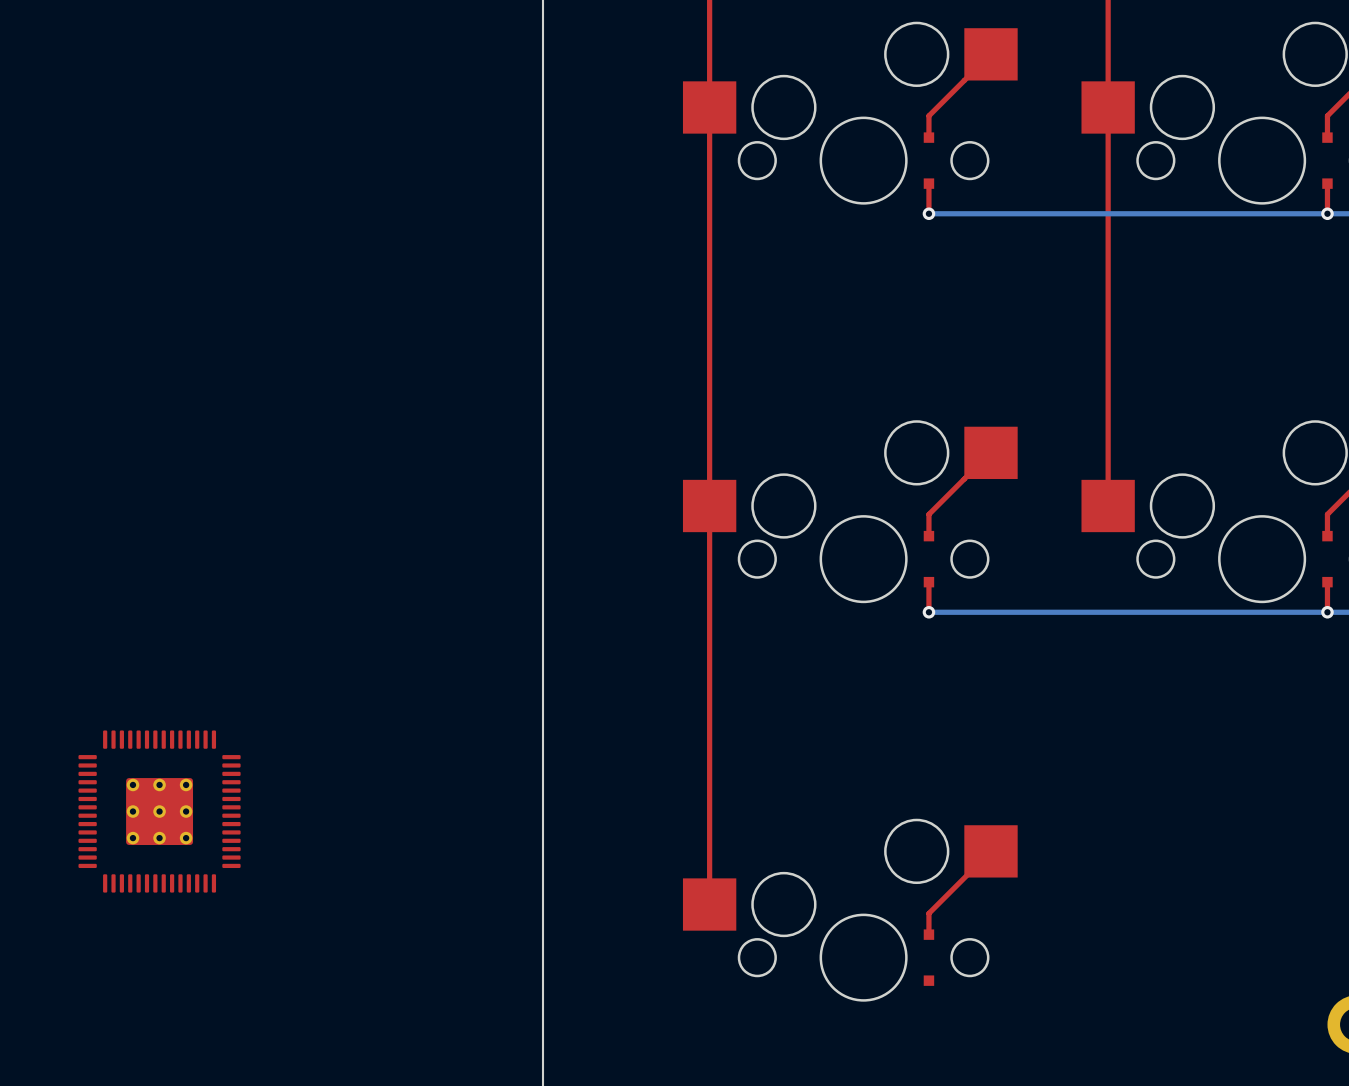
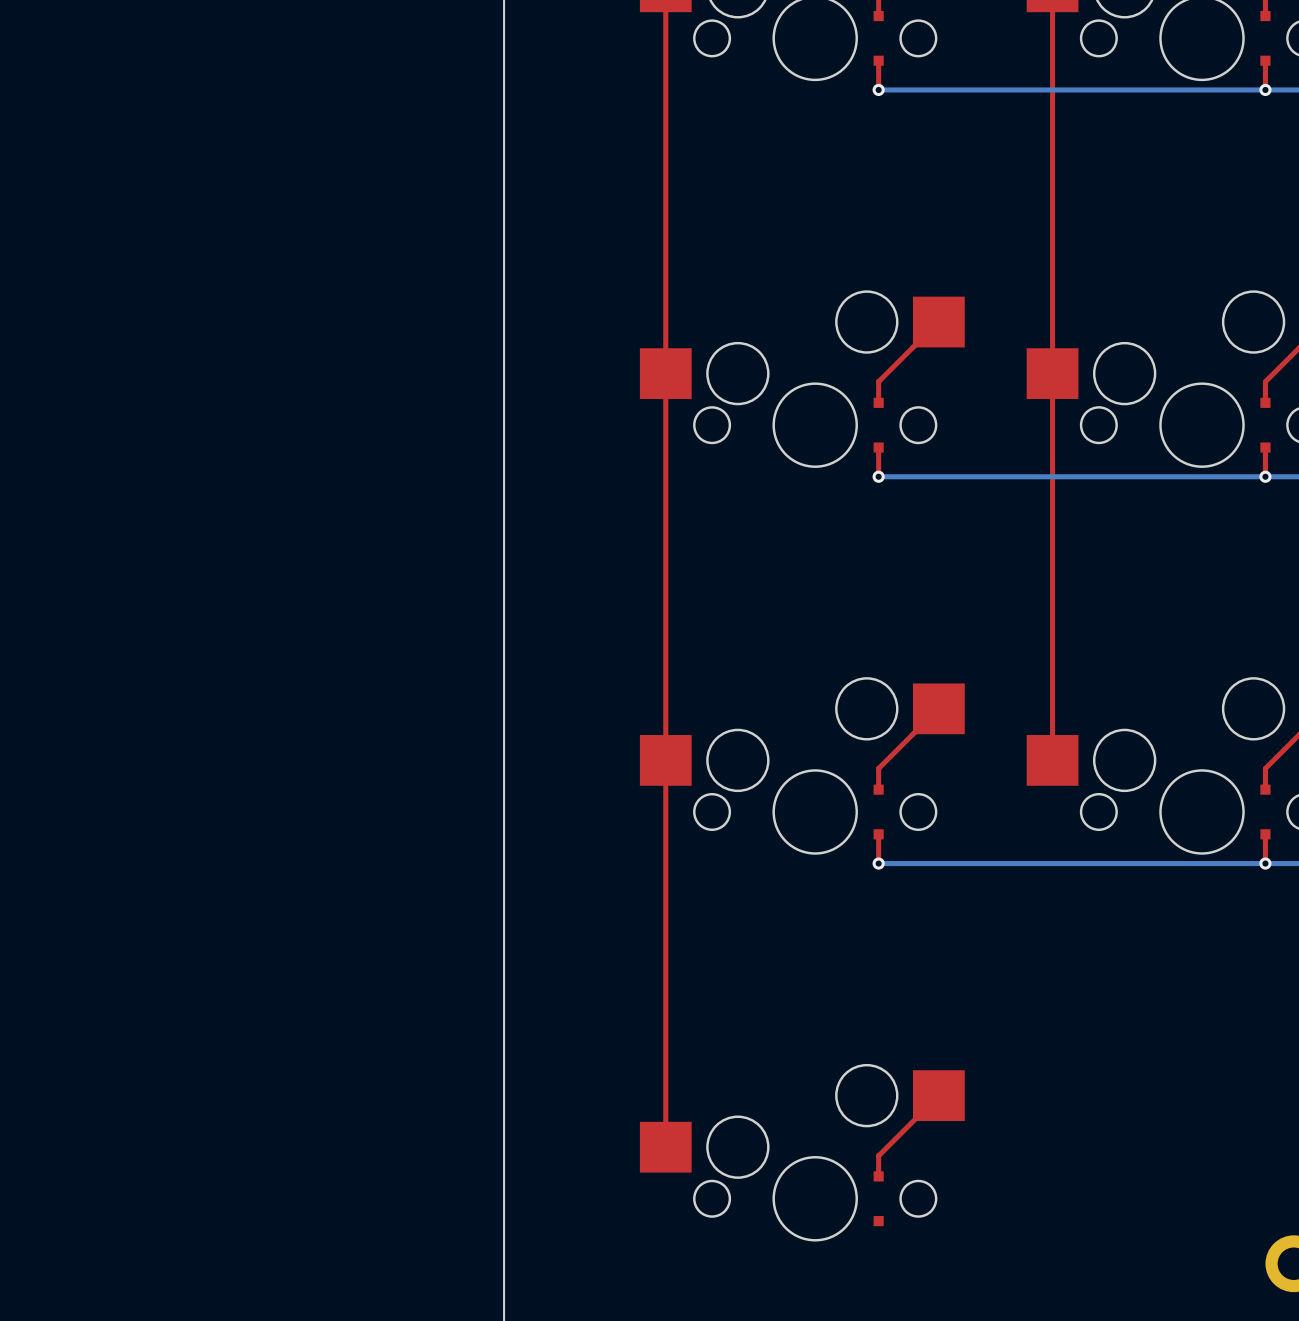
part: (159, 811) -> none

